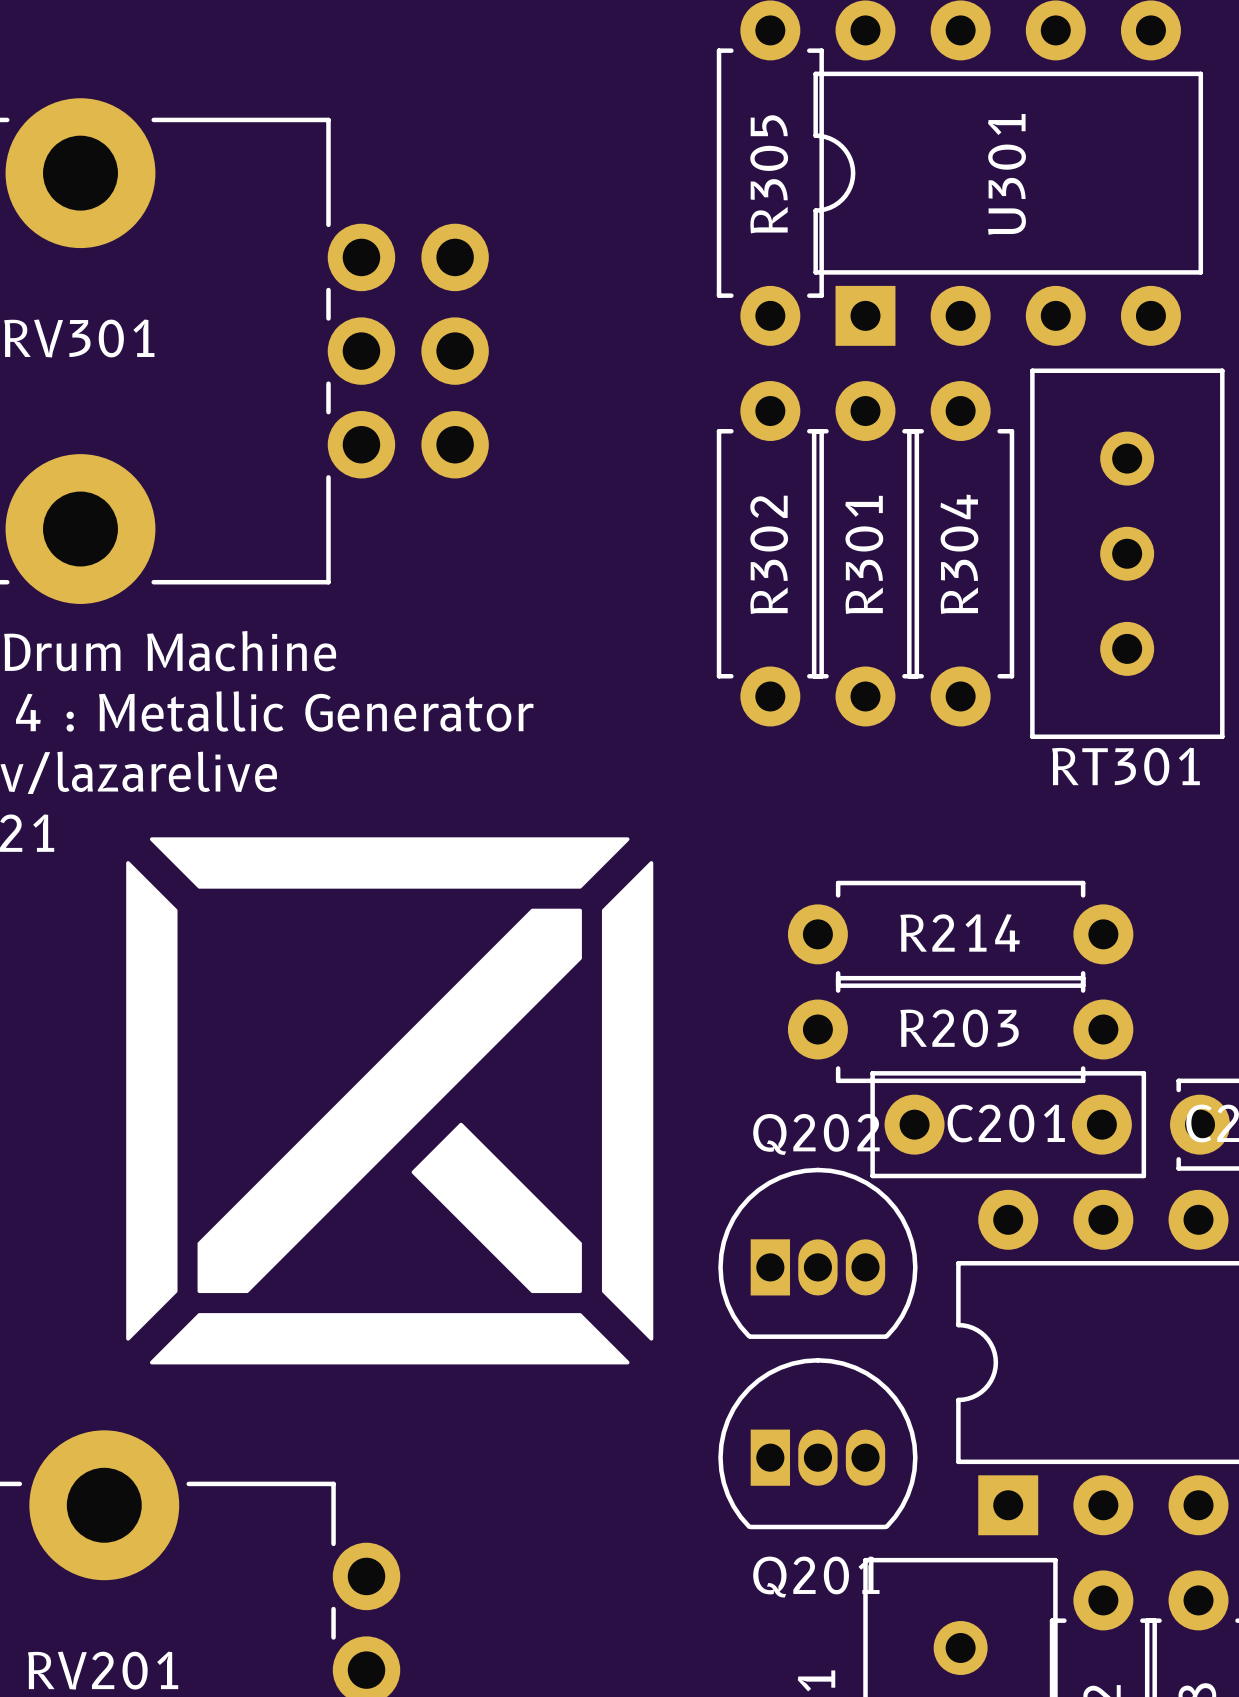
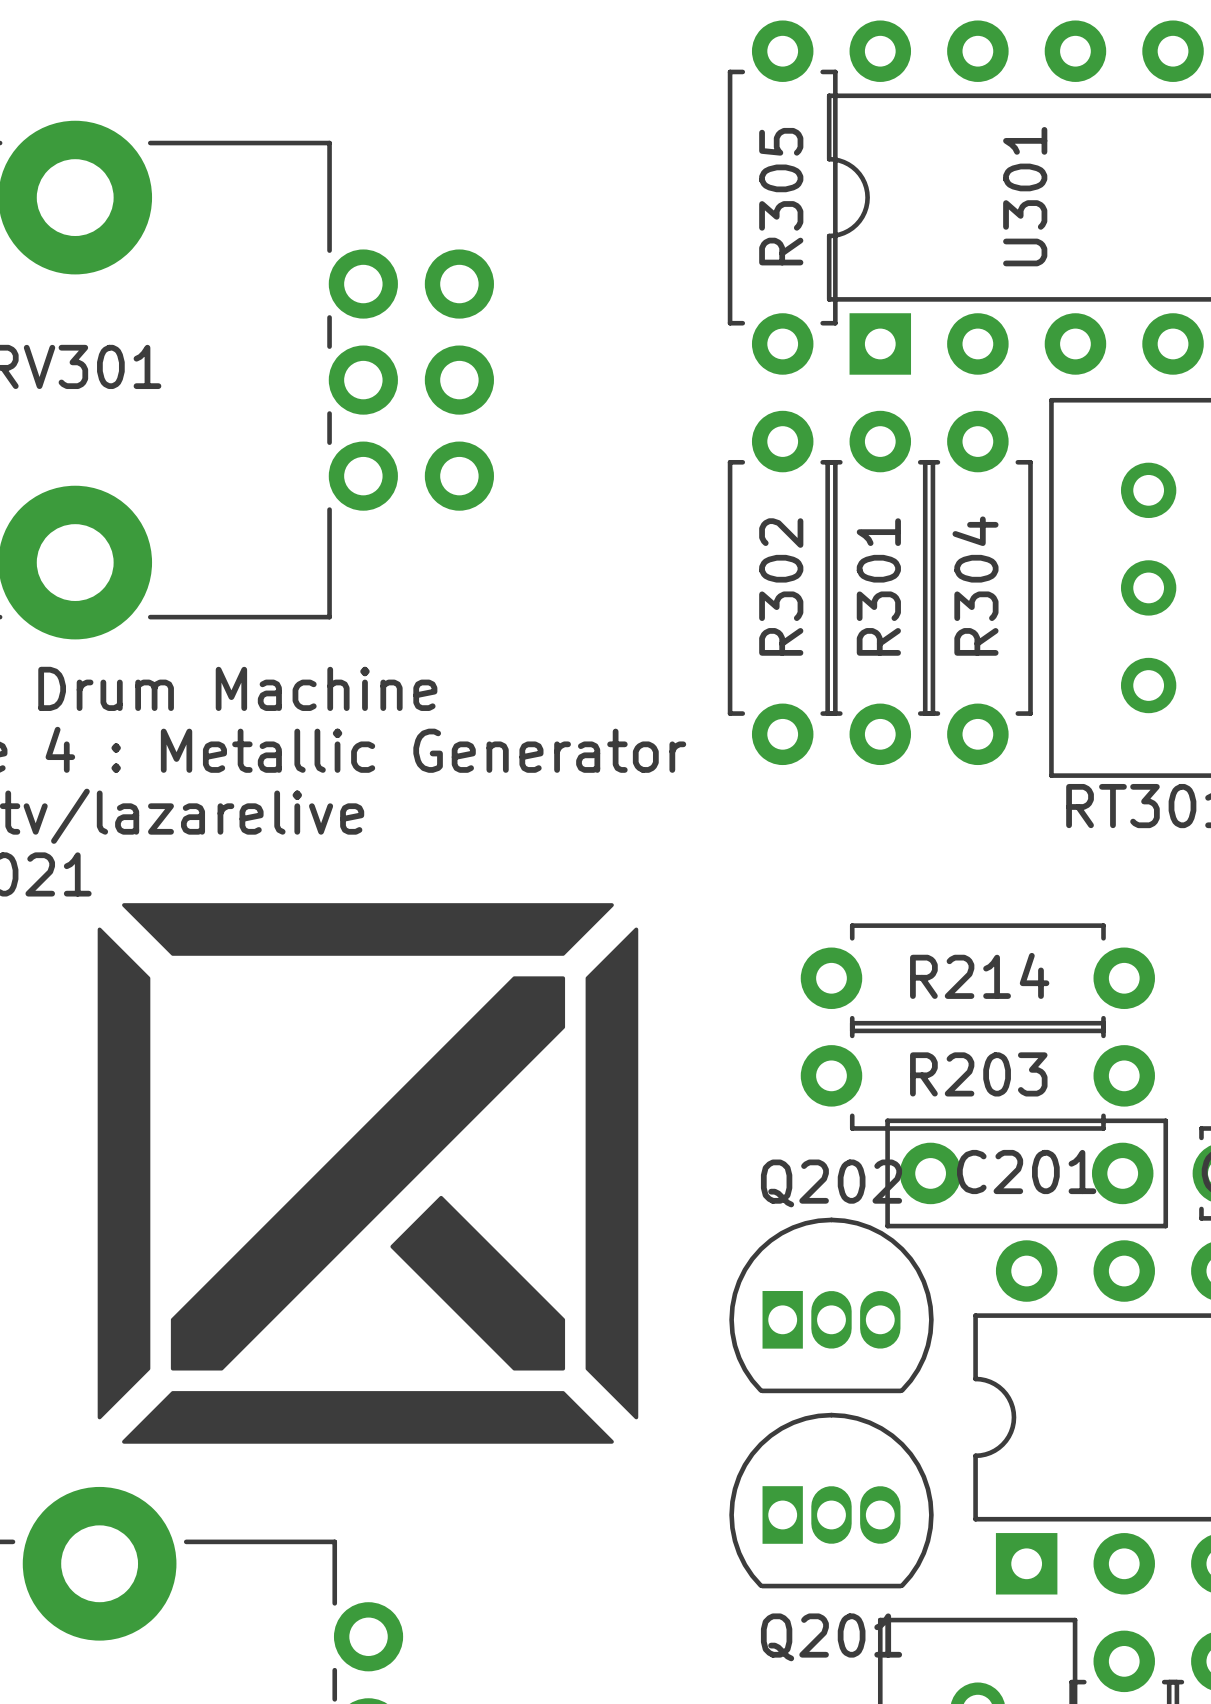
drawing position: (389, 1100) -> (367, 1173)

